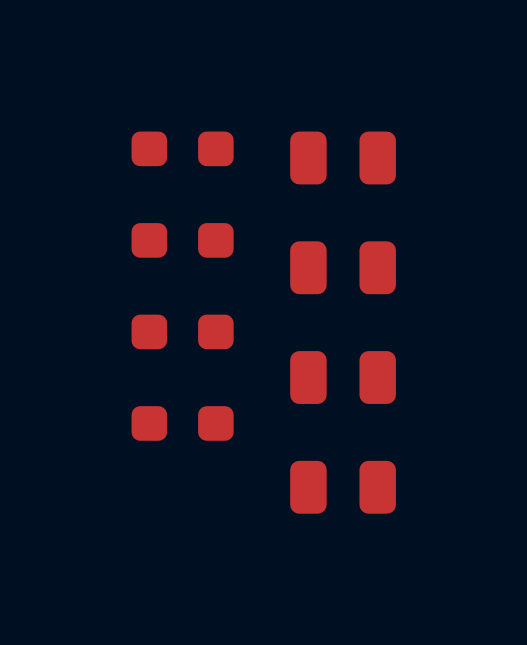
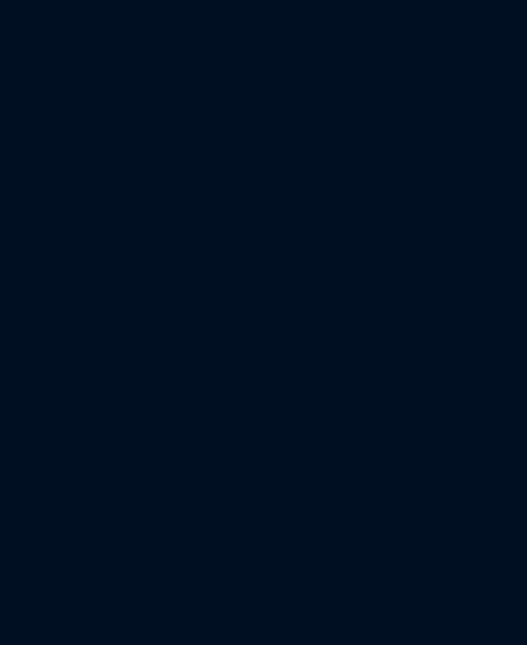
part: (182, 148) -> none
part: (343, 157) -> none
part: (182, 240) -> none
part: (343, 267) -> none
part: (182, 331) -> none
part: (343, 377) -> none
part: (182, 423) -> none
part: (343, 487) -> none

